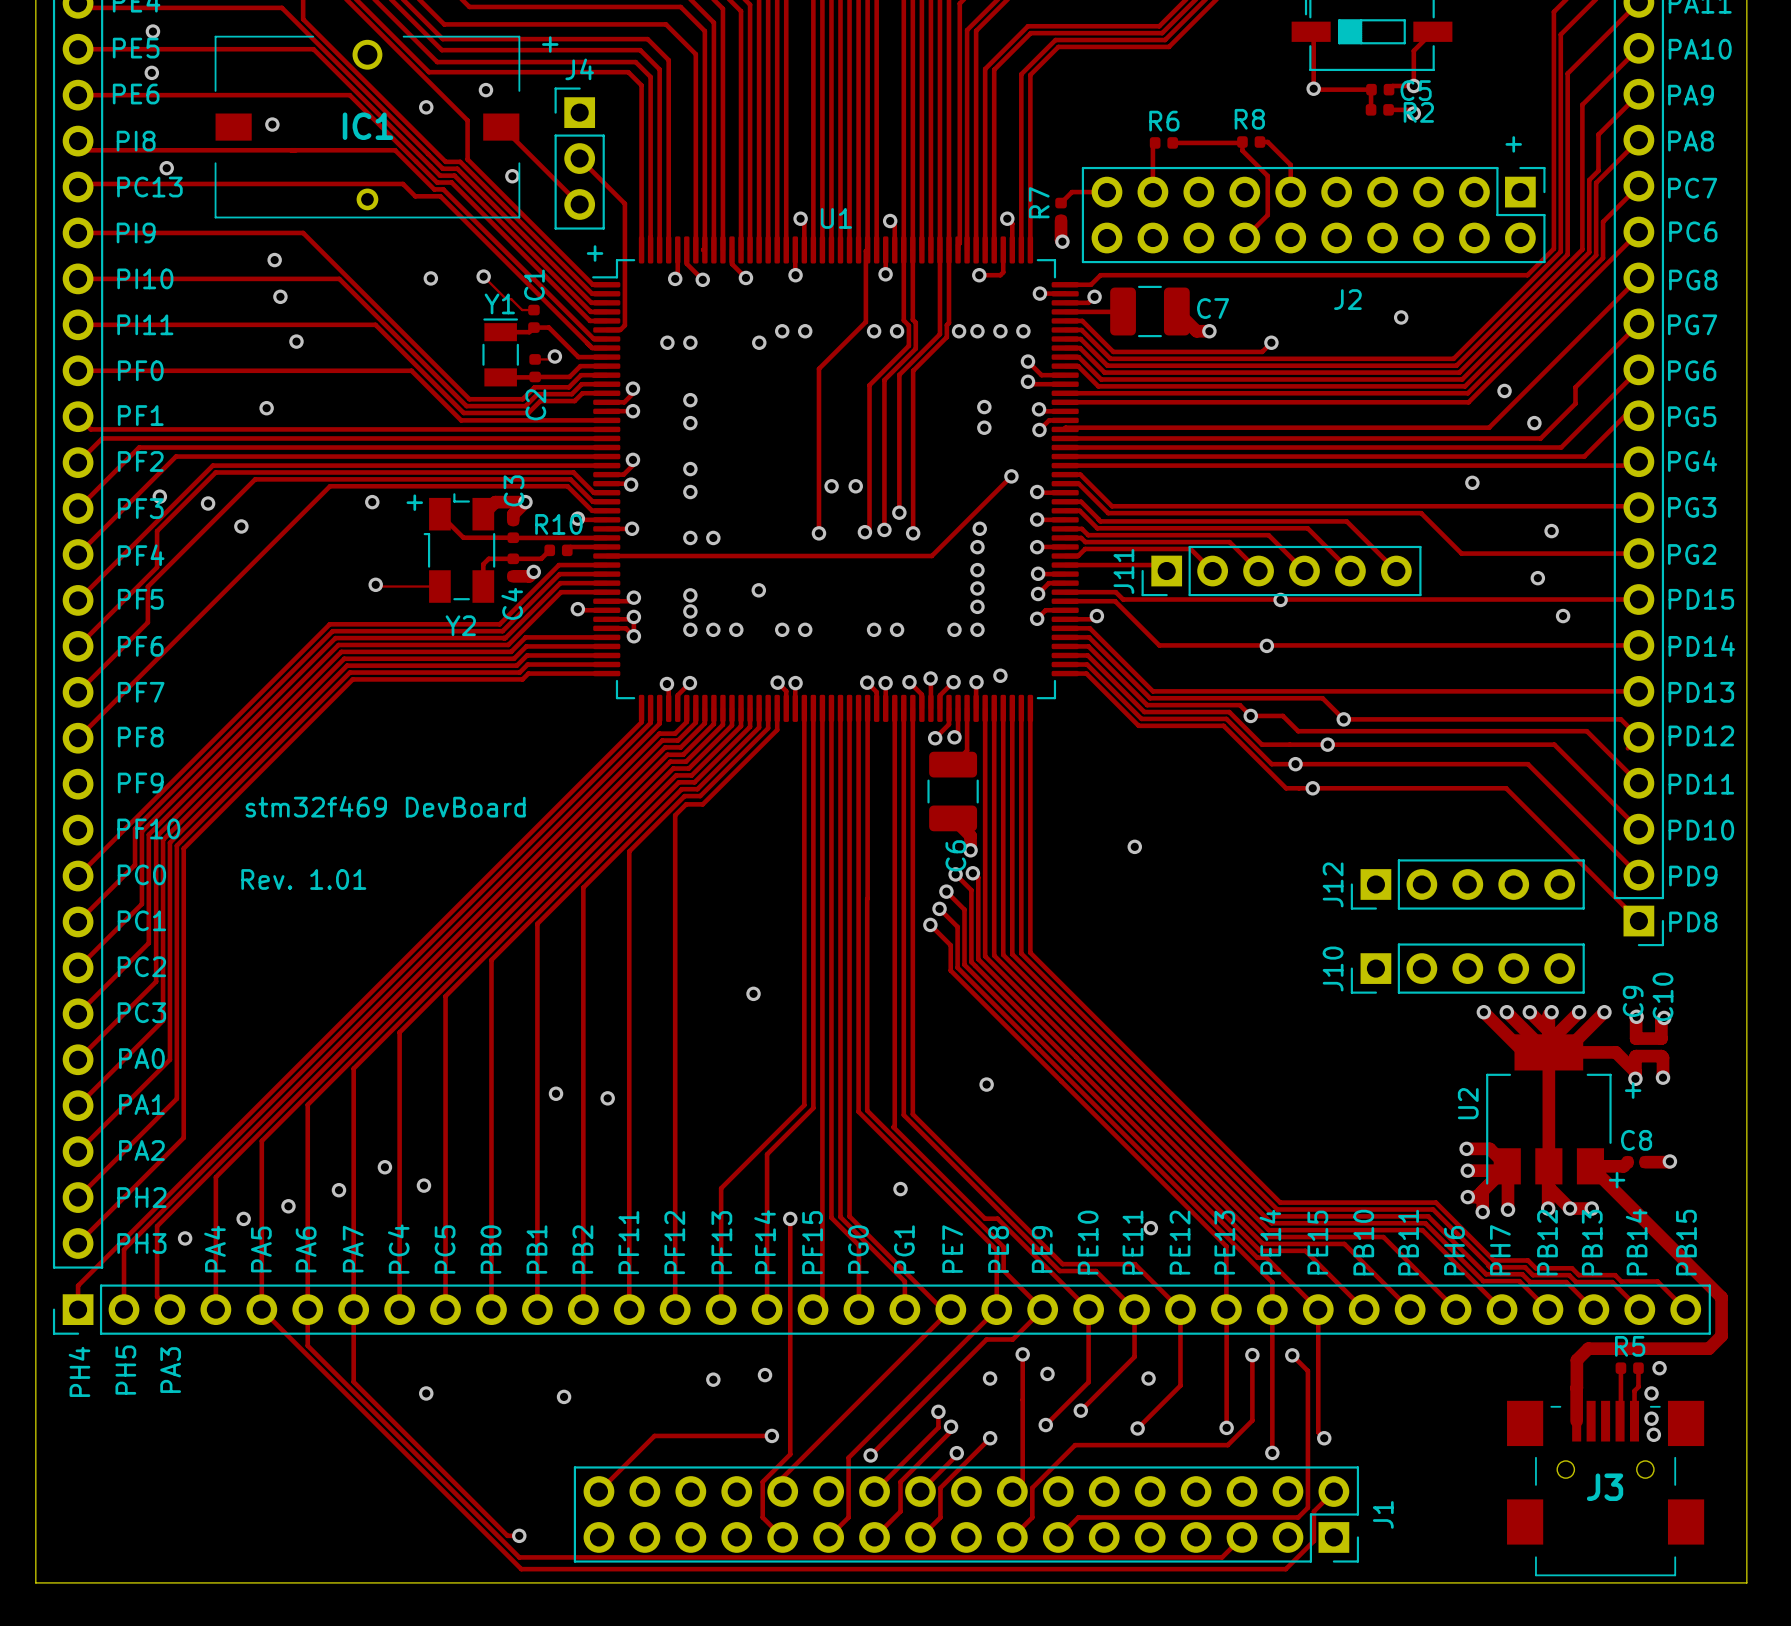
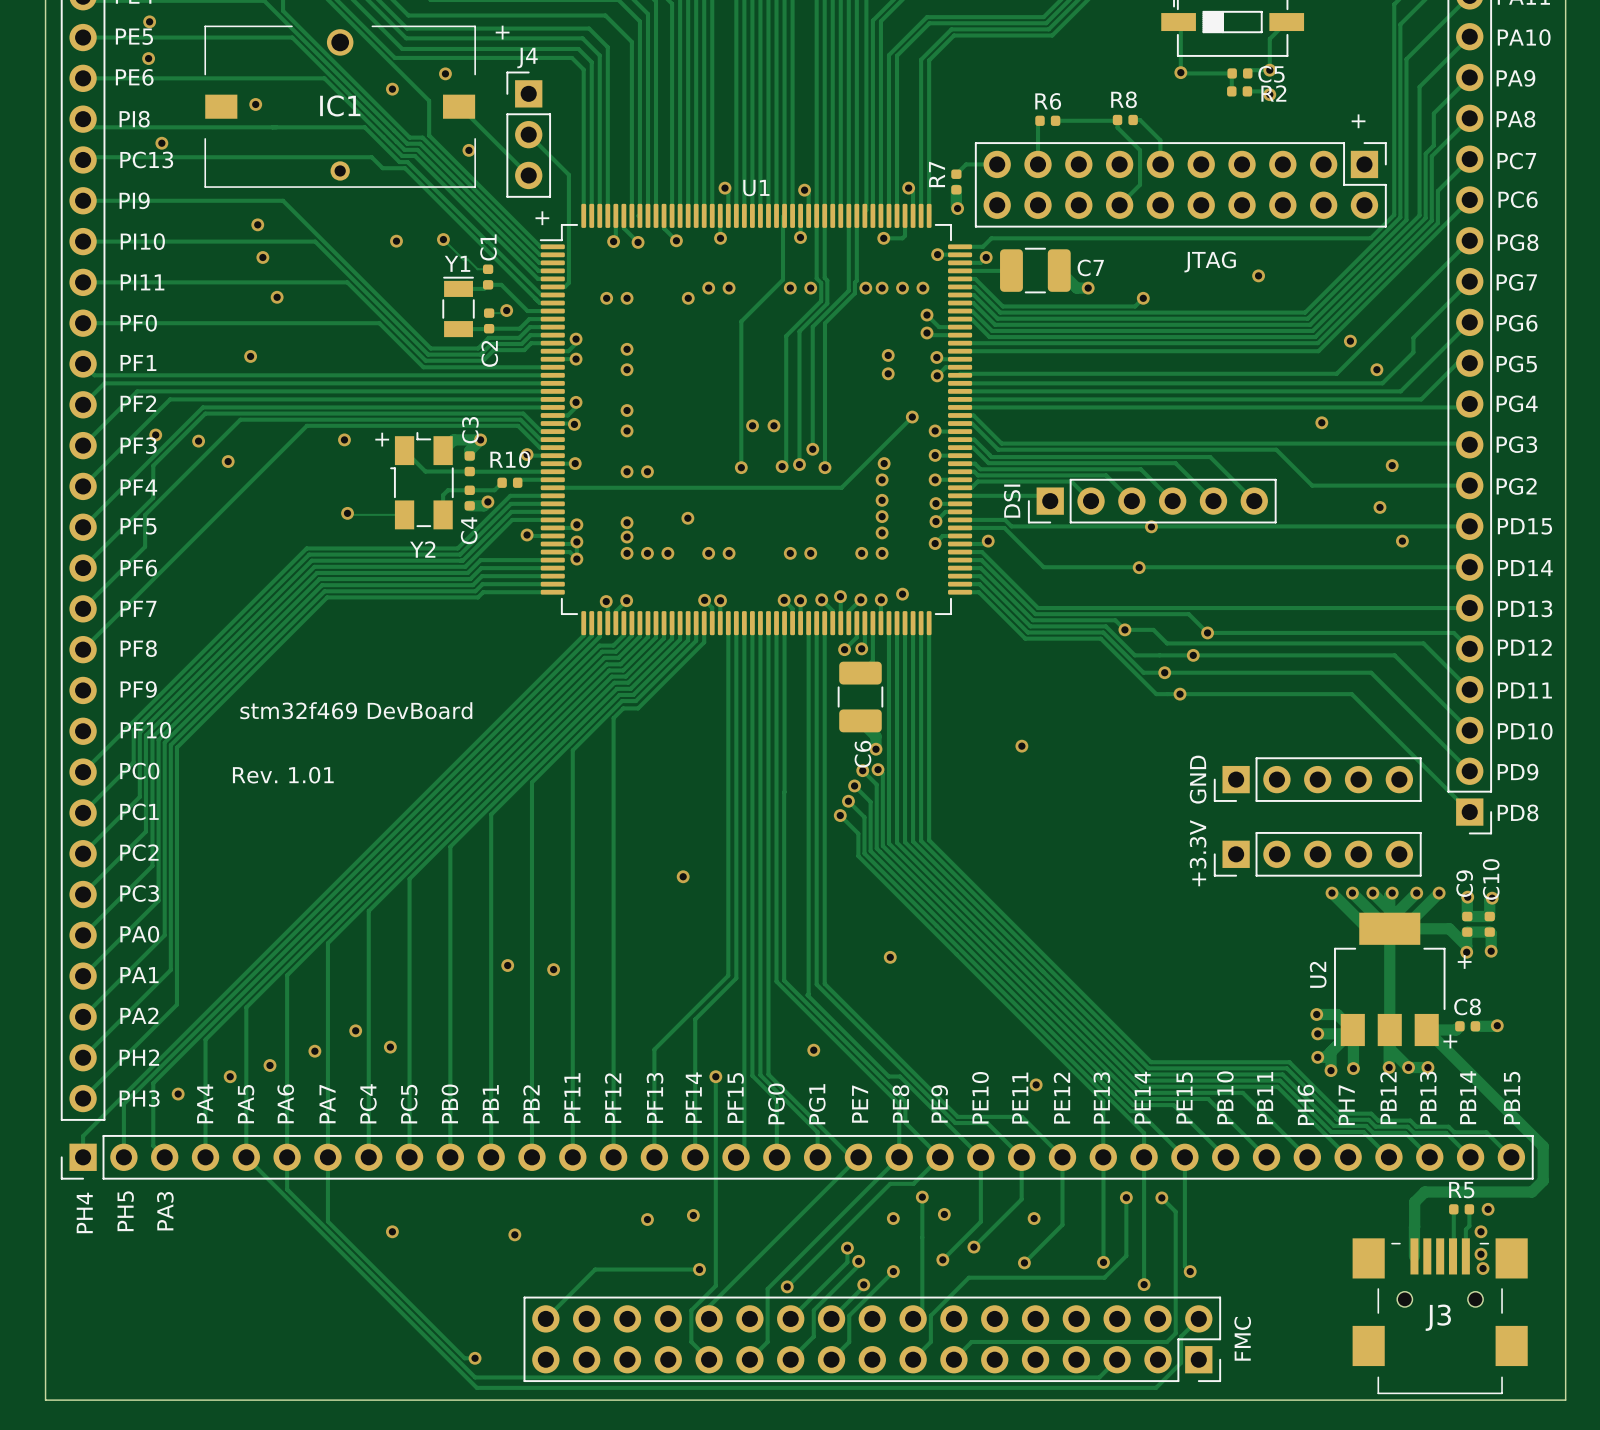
J2 name: J2 (1347, 299) -> JTAG (1210, 262)
J11 name: J11 (1123, 571) -> DSI (1012, 501)
J12 name: J12 (1333, 884) -> GND (1198, 779)
J10 name: J10 (1333, 969) -> +3.3V (1198, 853)
J1 name: J1 (1383, 1514) -> FMC (1242, 1338)

